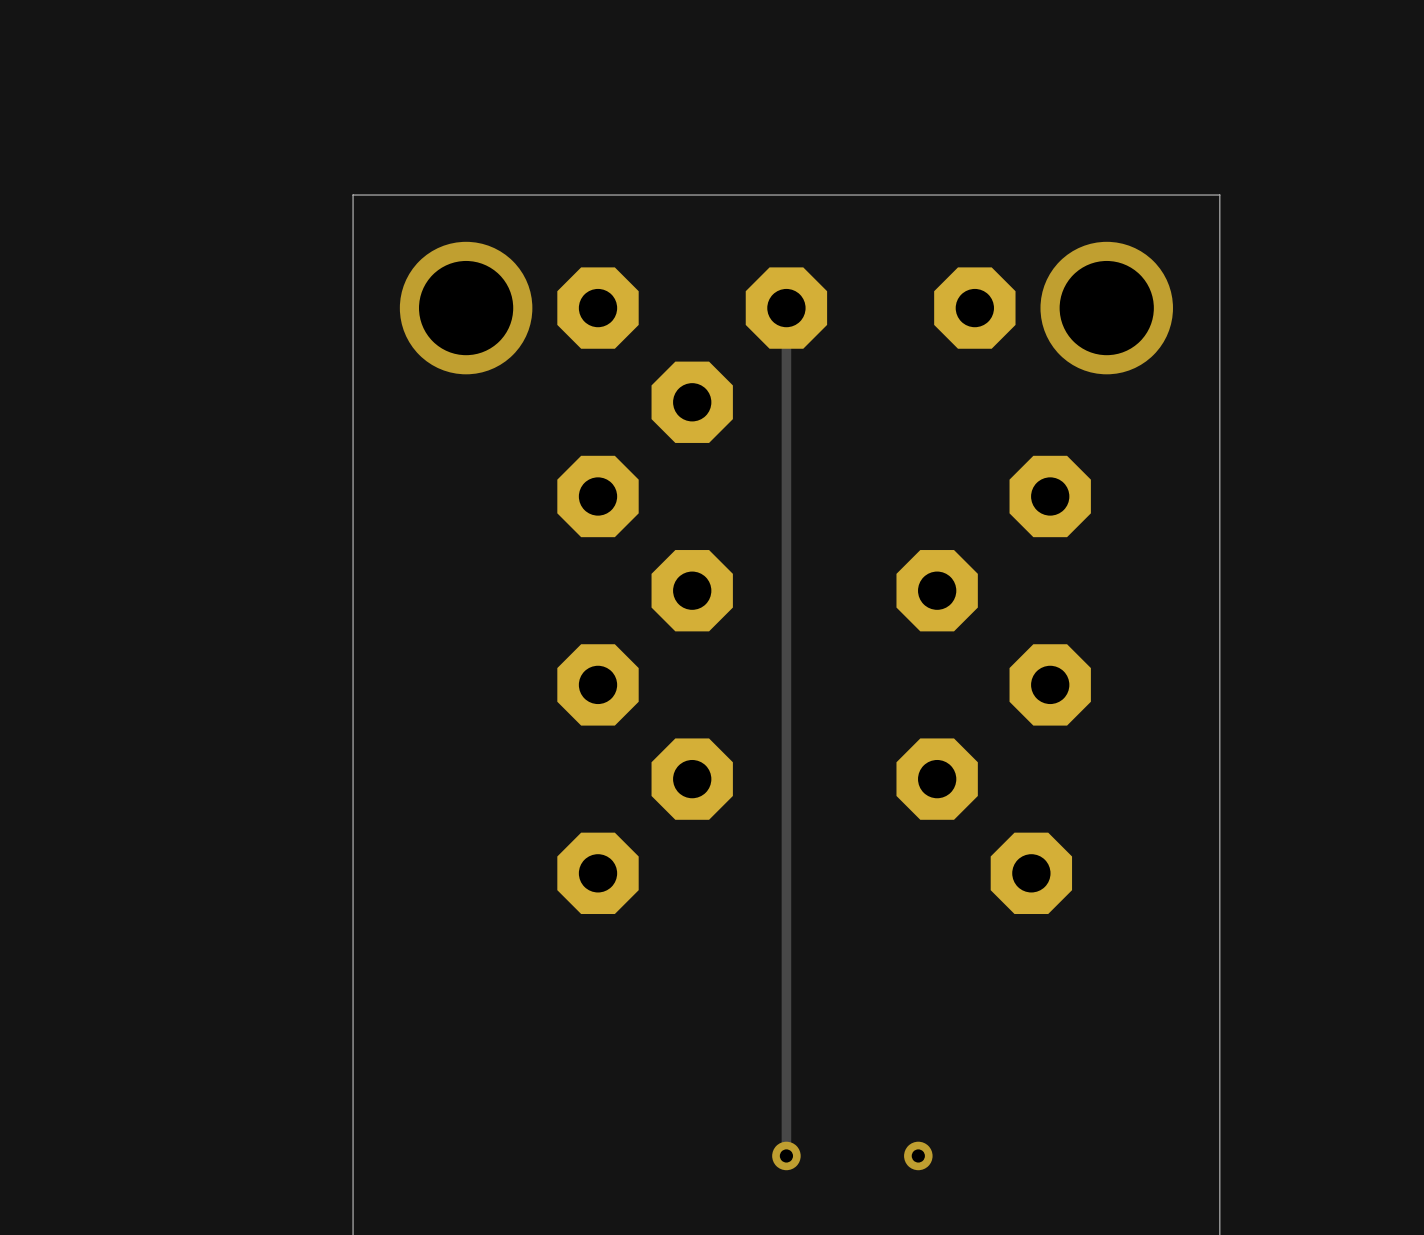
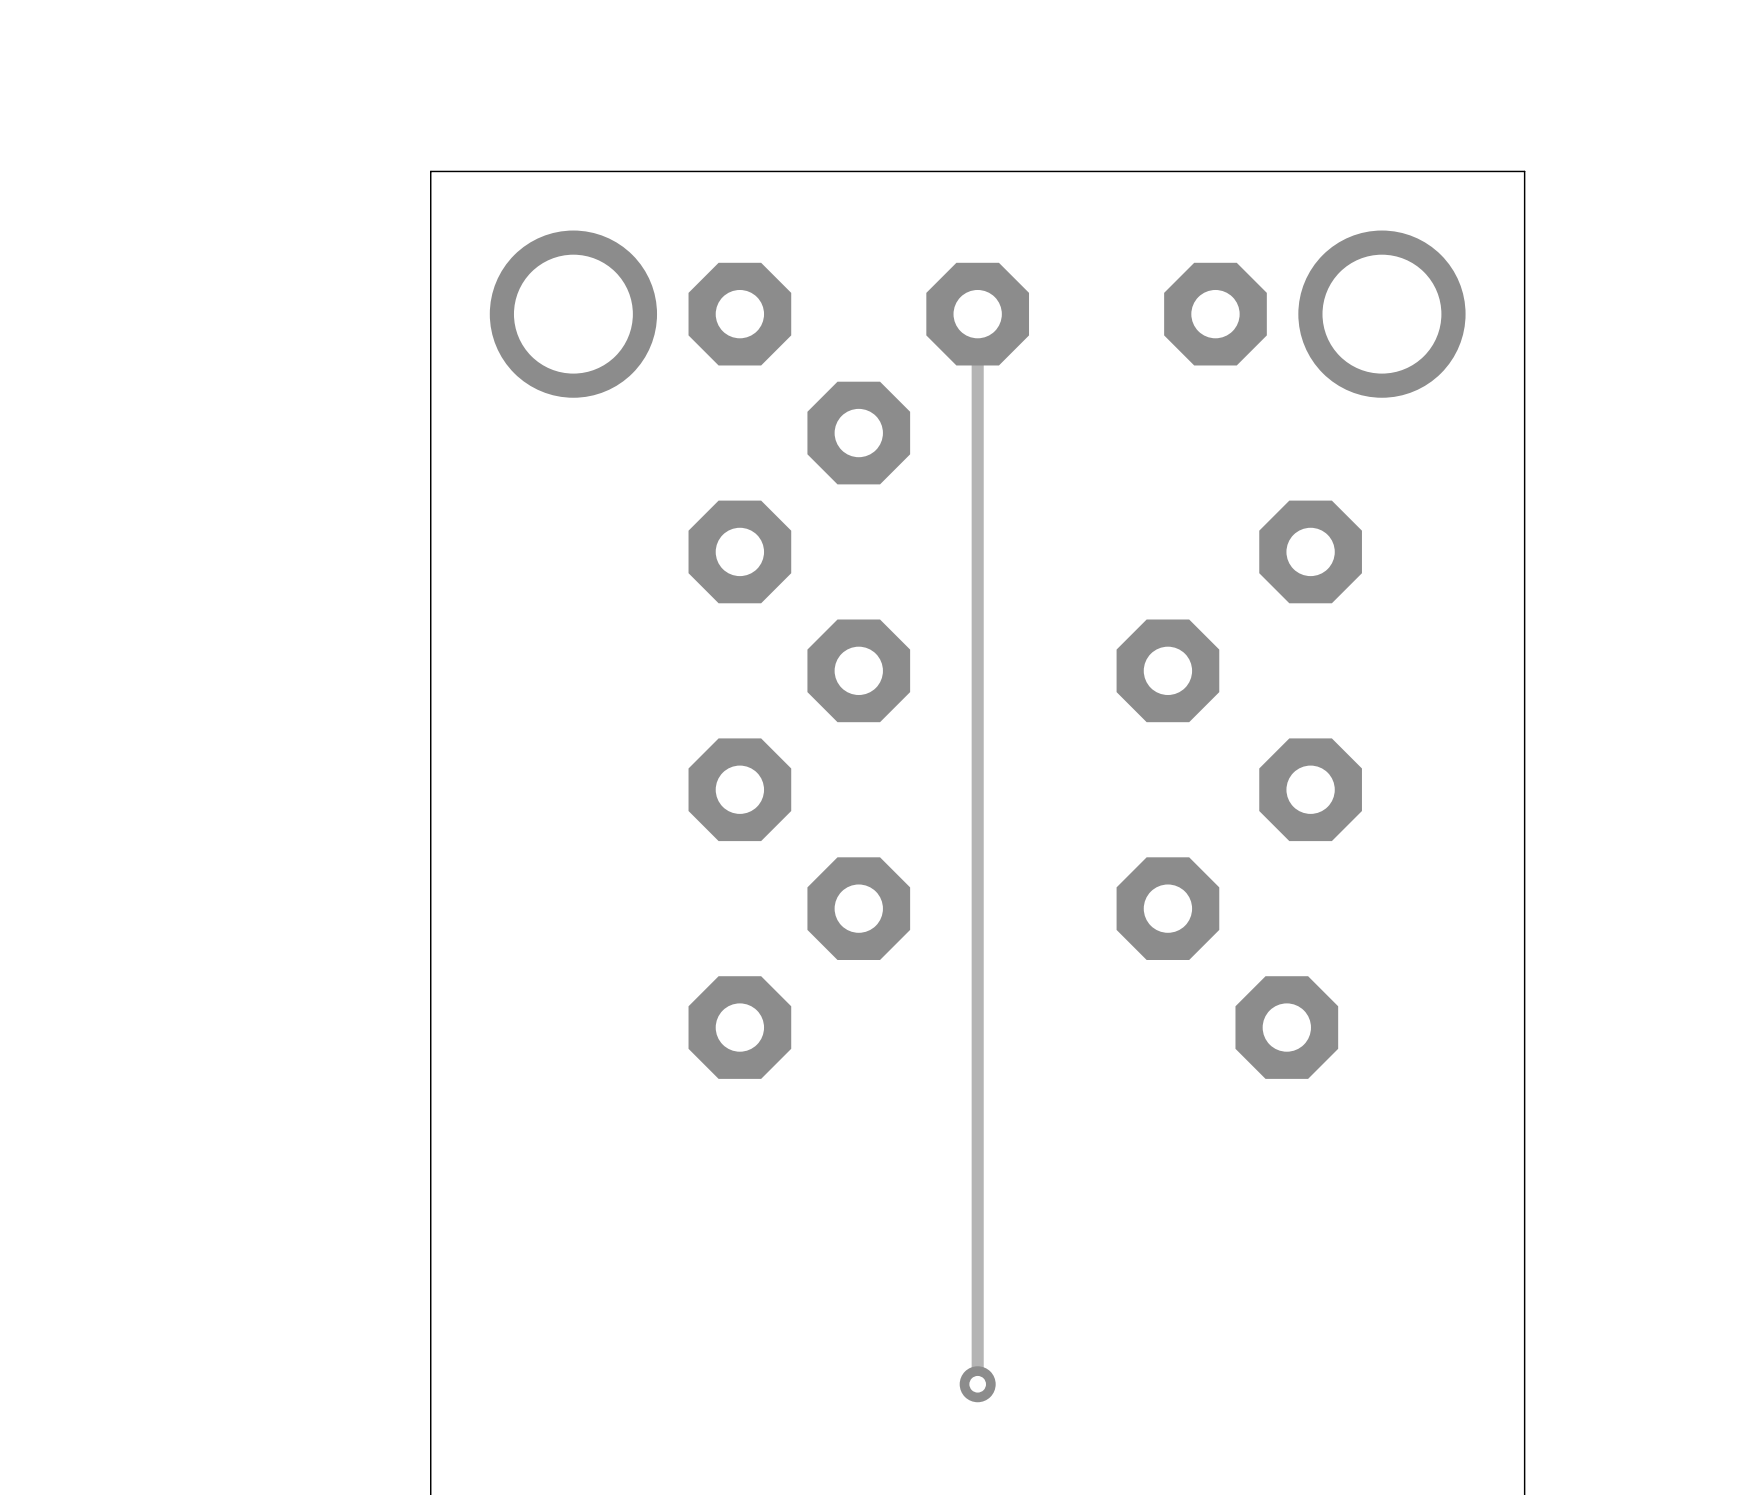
via: (918, 1155) -> none

